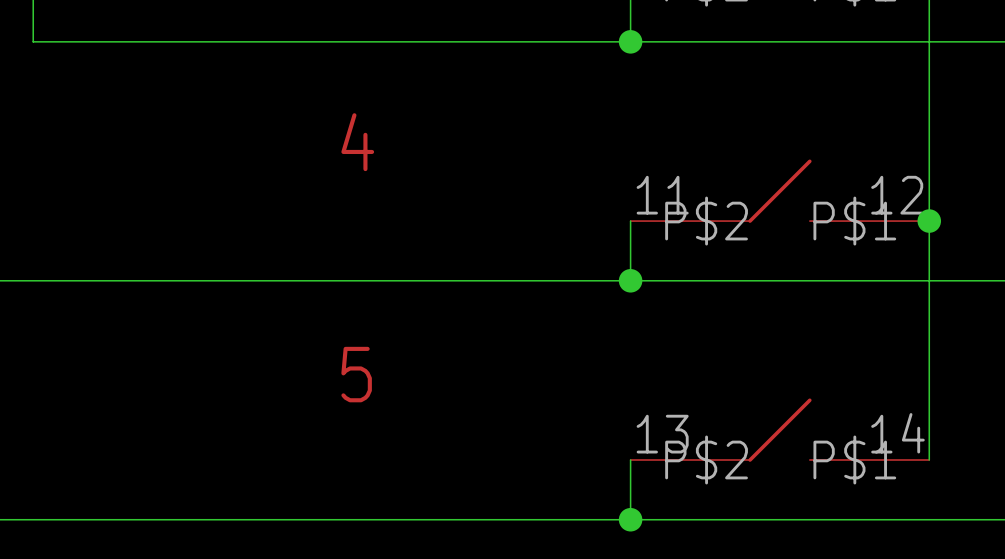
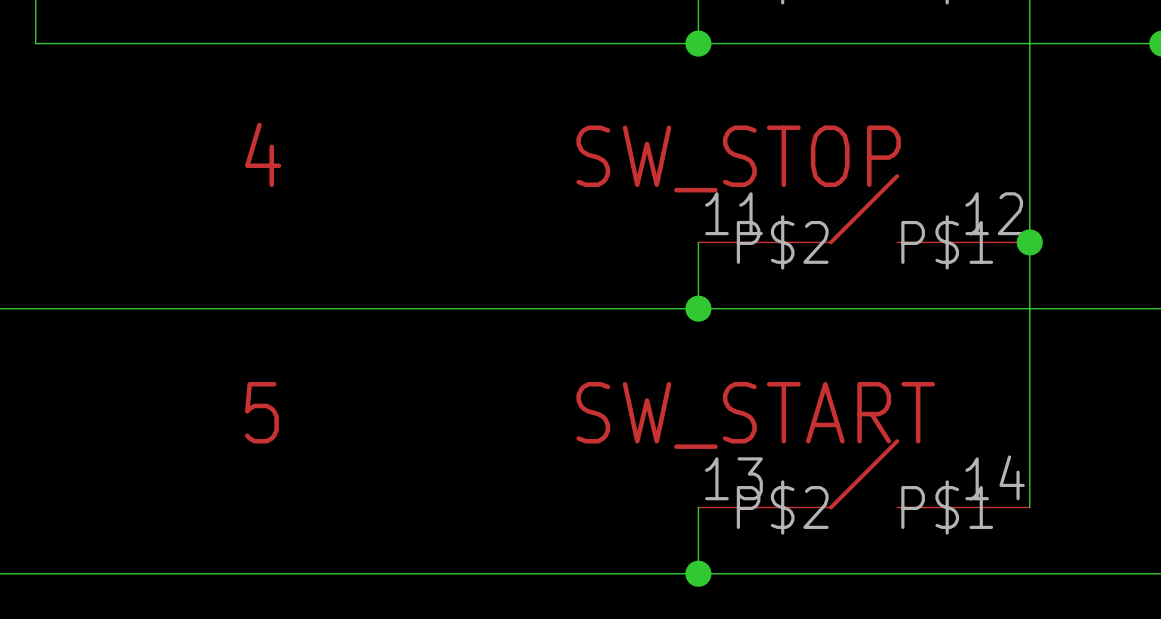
text position: 4 (357, 142) -> 4 (263, 154)
text: none -> SW_STOP (738, 158)
text position: 5 (356, 374) -> 5 (261, 412)
text: none -> SW_START (755, 415)

